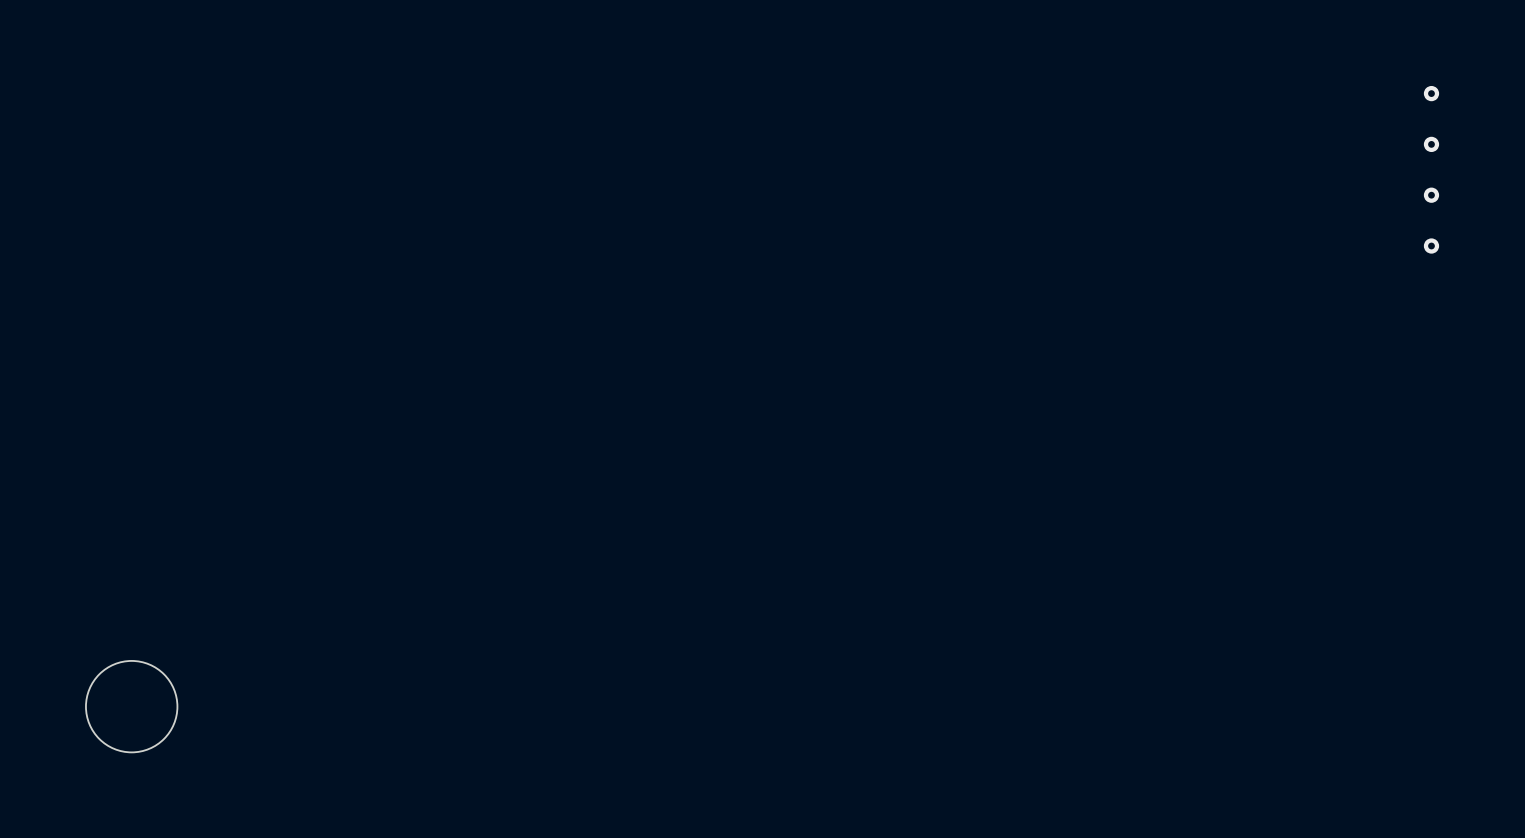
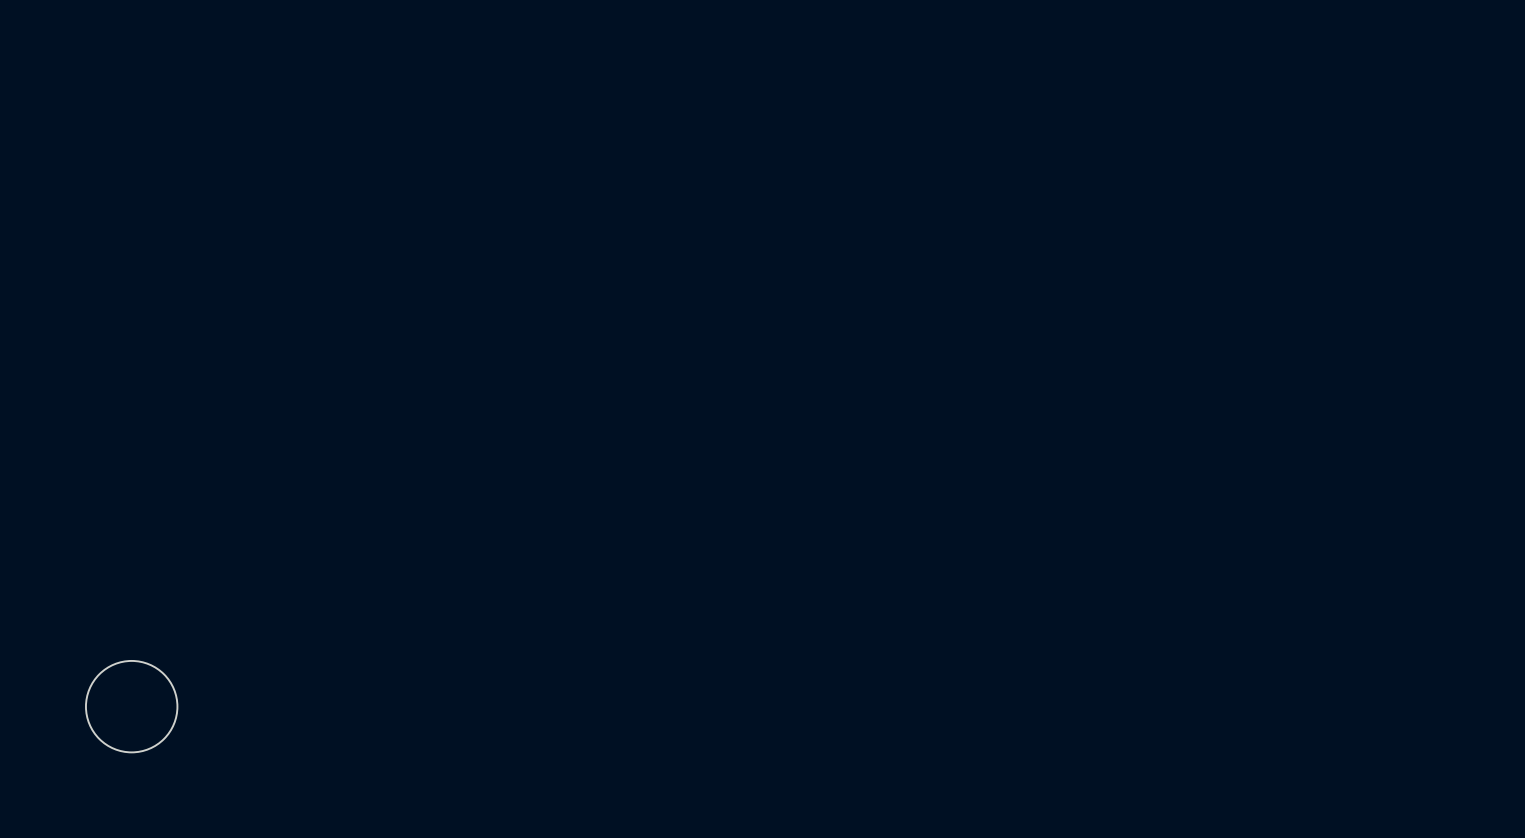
via: (1431, 93) -> none
via: (1431, 144) -> none
via: (1431, 195) -> none
via: (1431, 246) -> none

